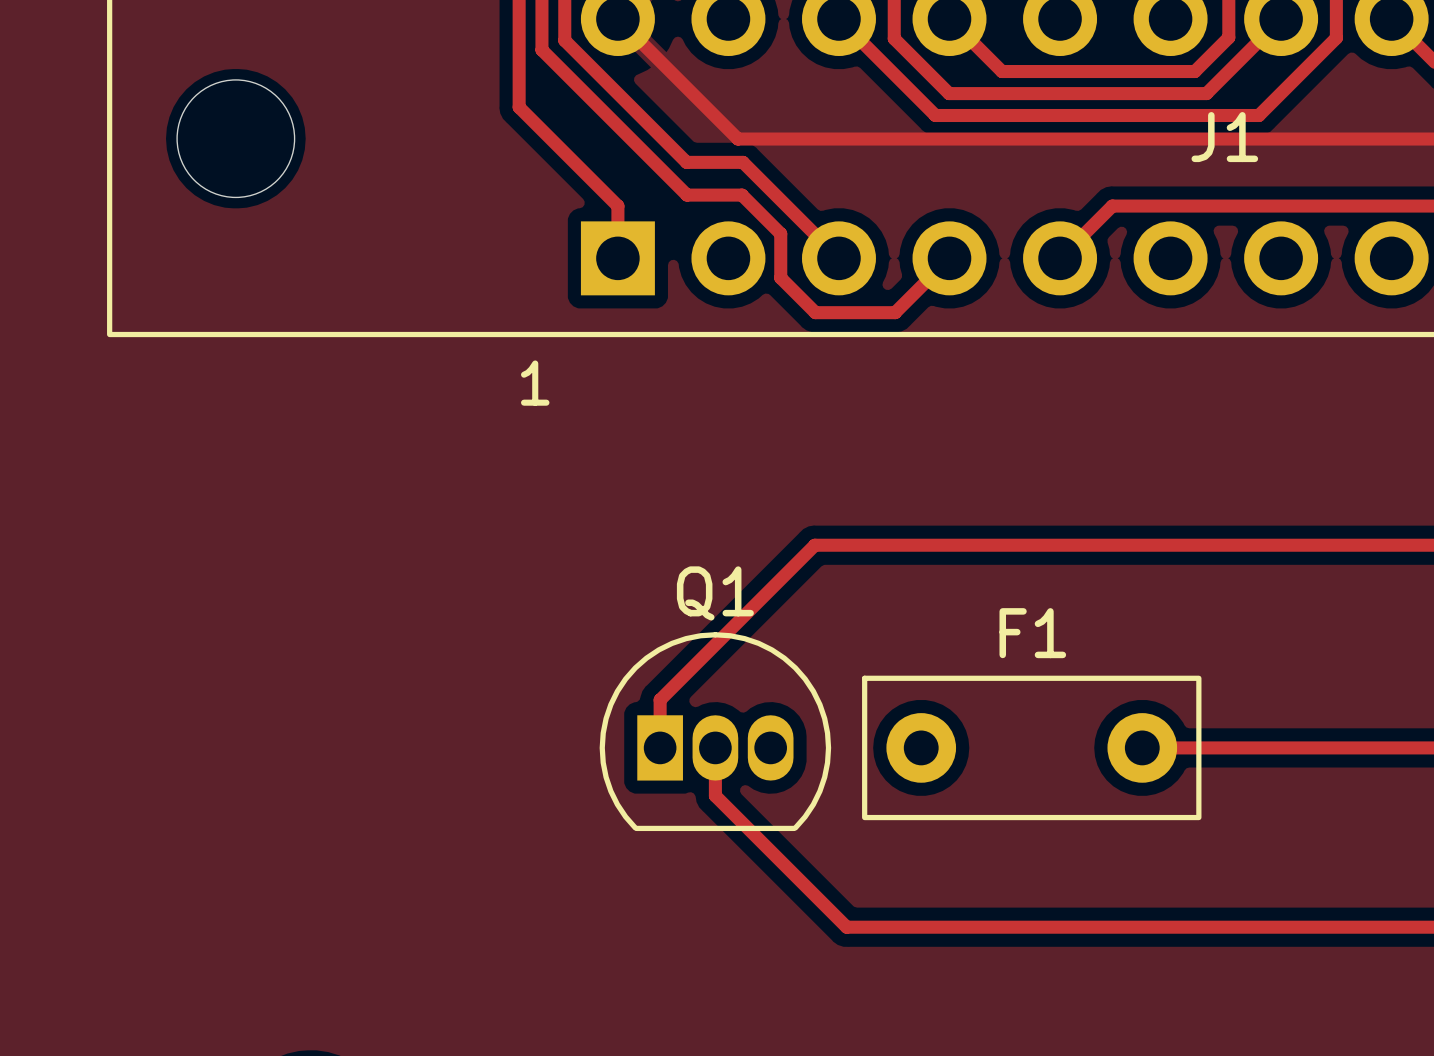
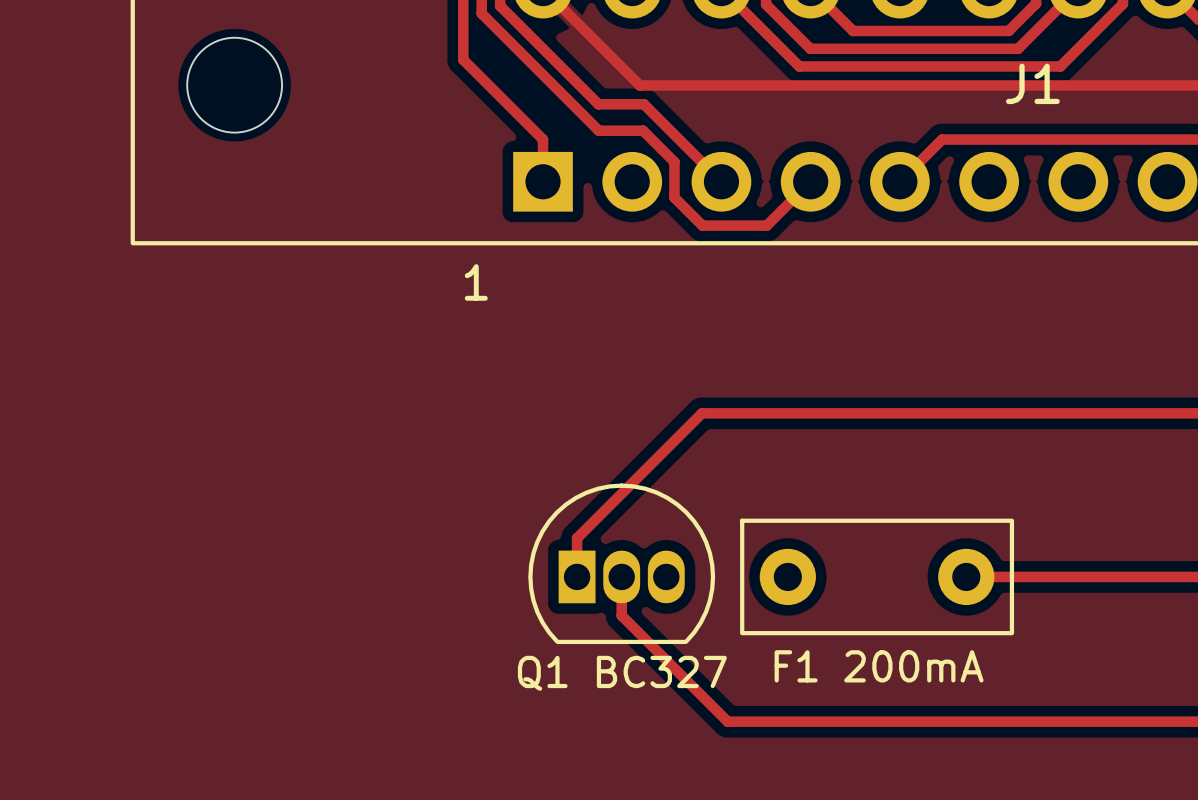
Q1 name: Q1 (715, 593) -> none
F1 name: F1 (1032, 633) -> none
text: none -> F1 200mA (879, 666)
text: none -> Q1 BC327 (622, 673)

